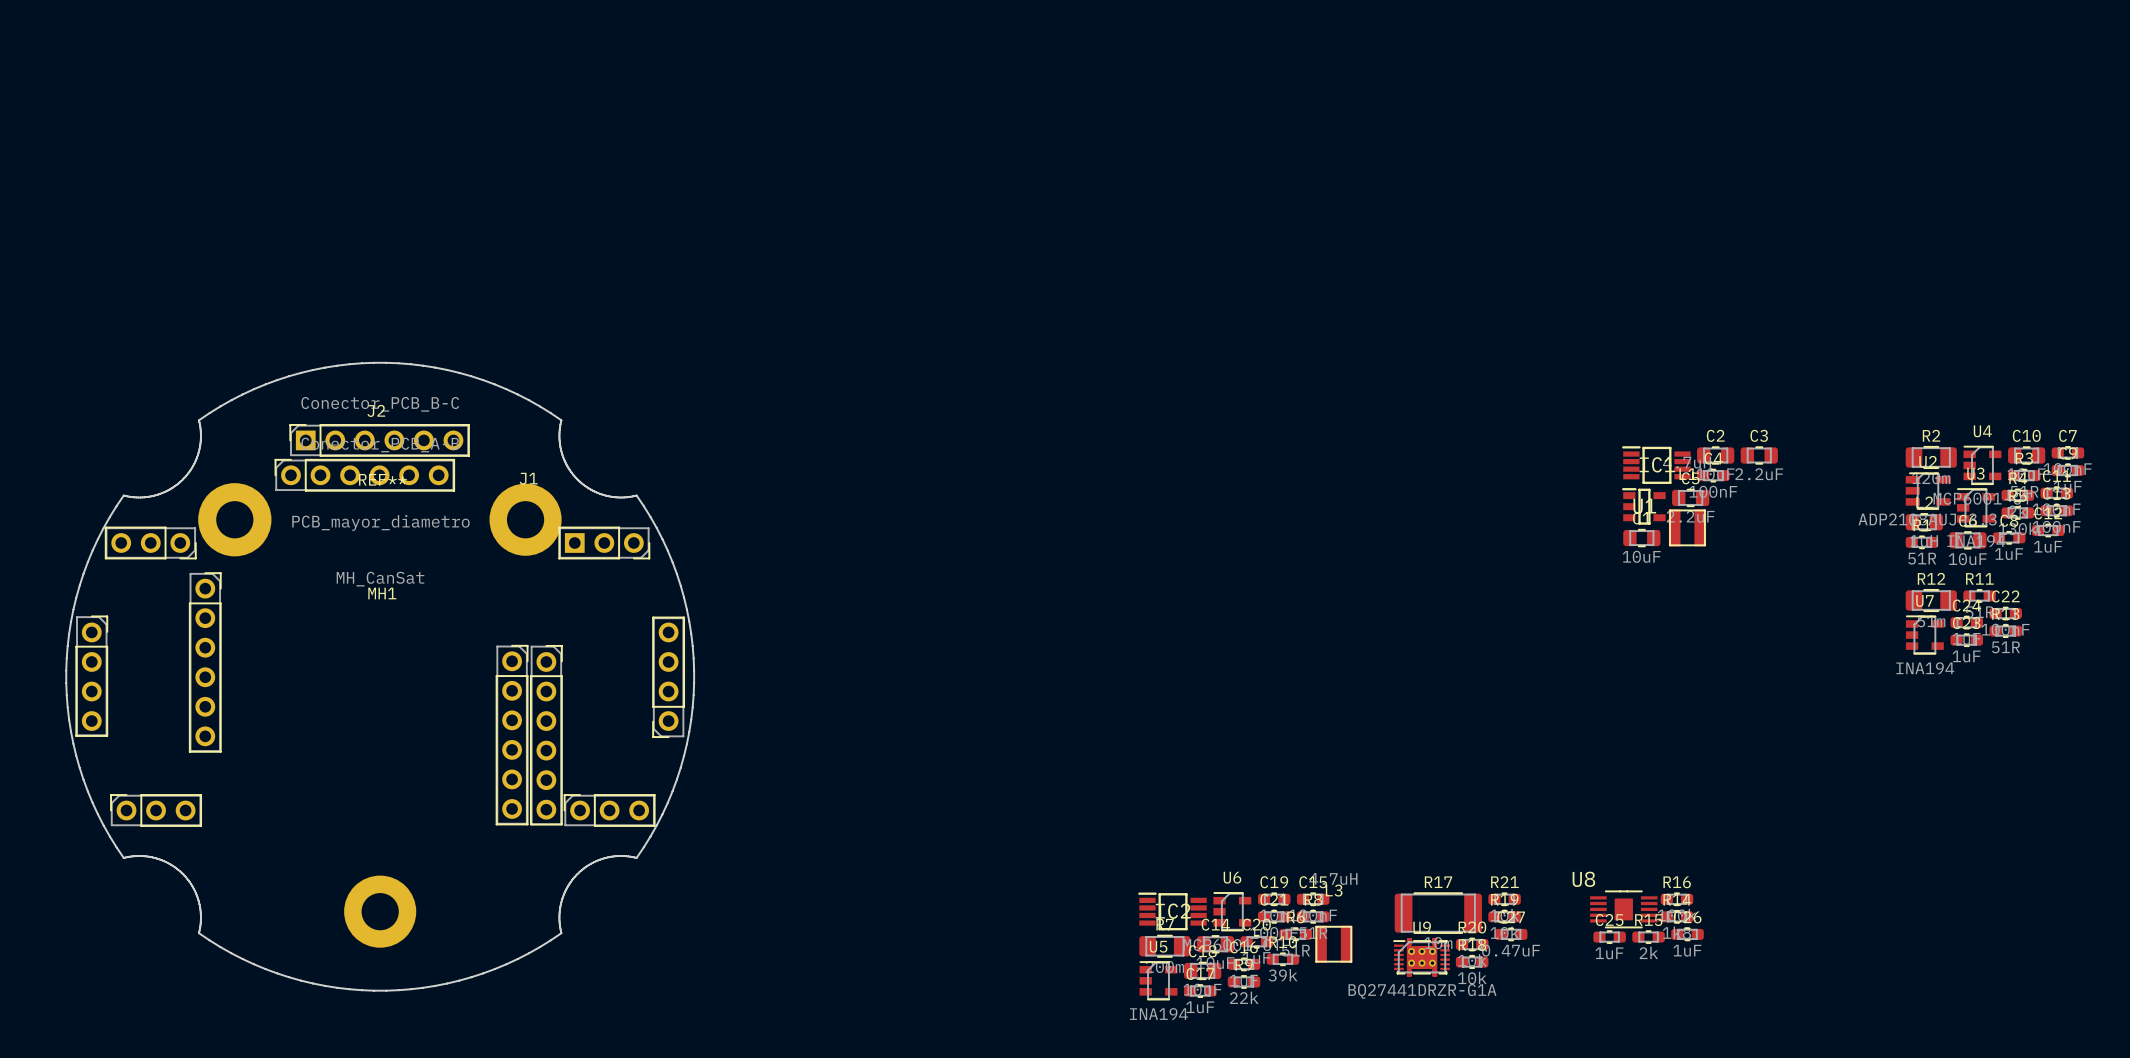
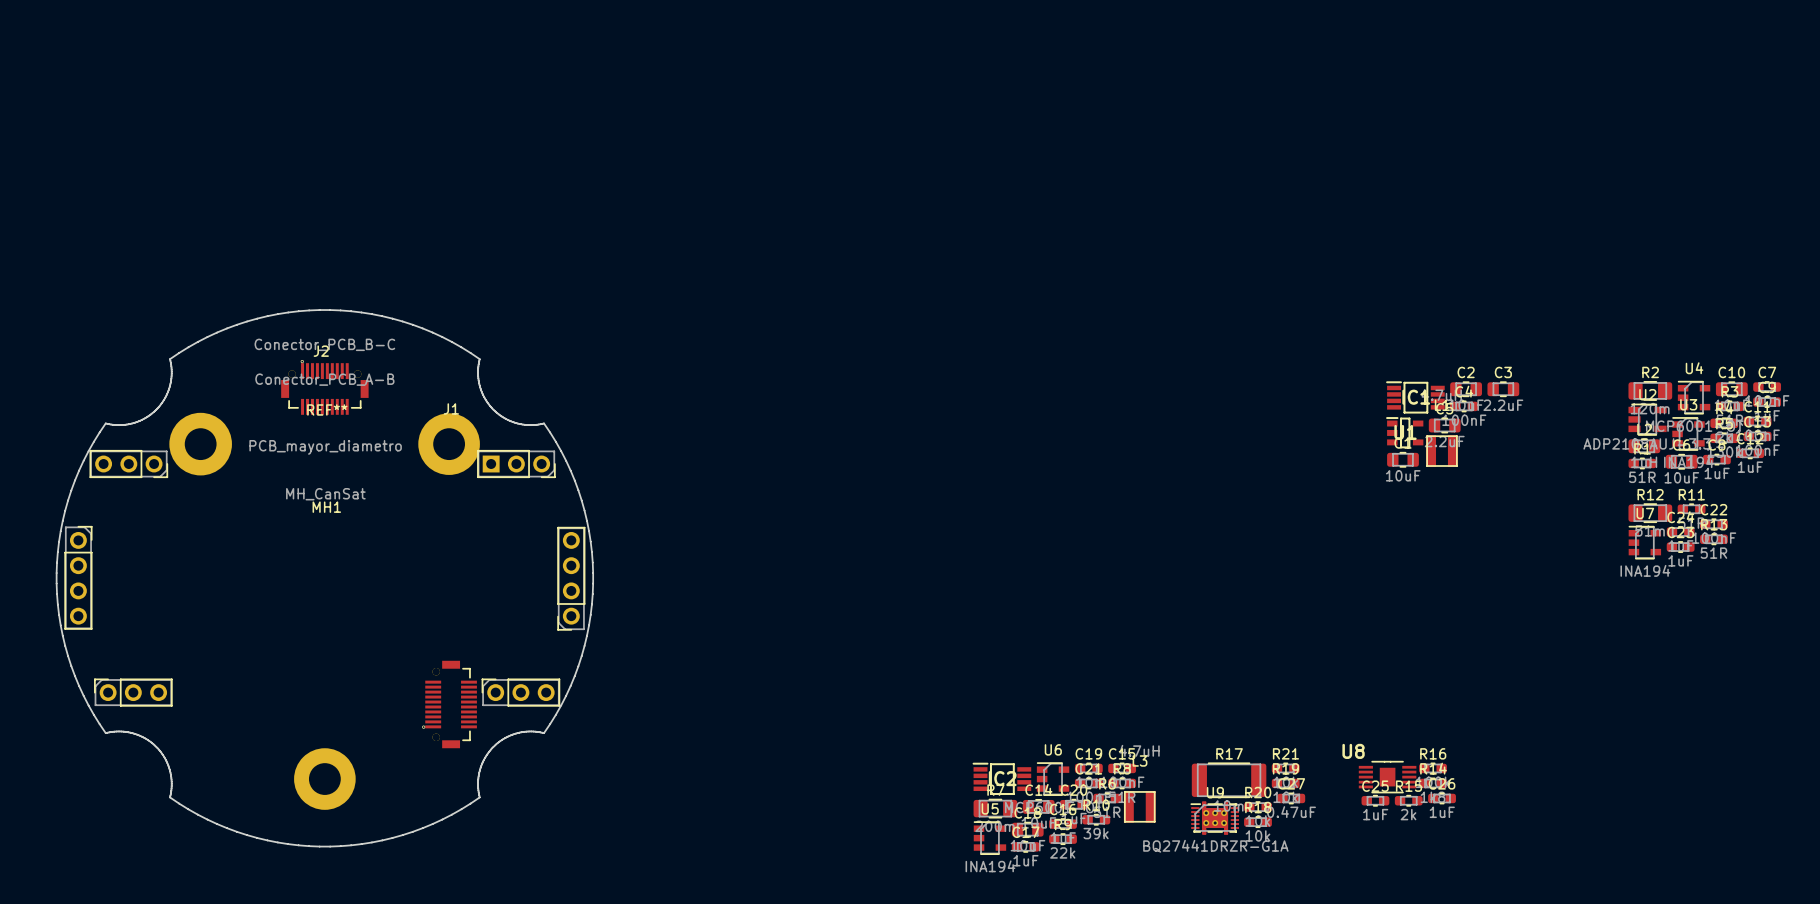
J1 footprint: [189, 424, 563, 826] -> [281, 359, 477, 749]

